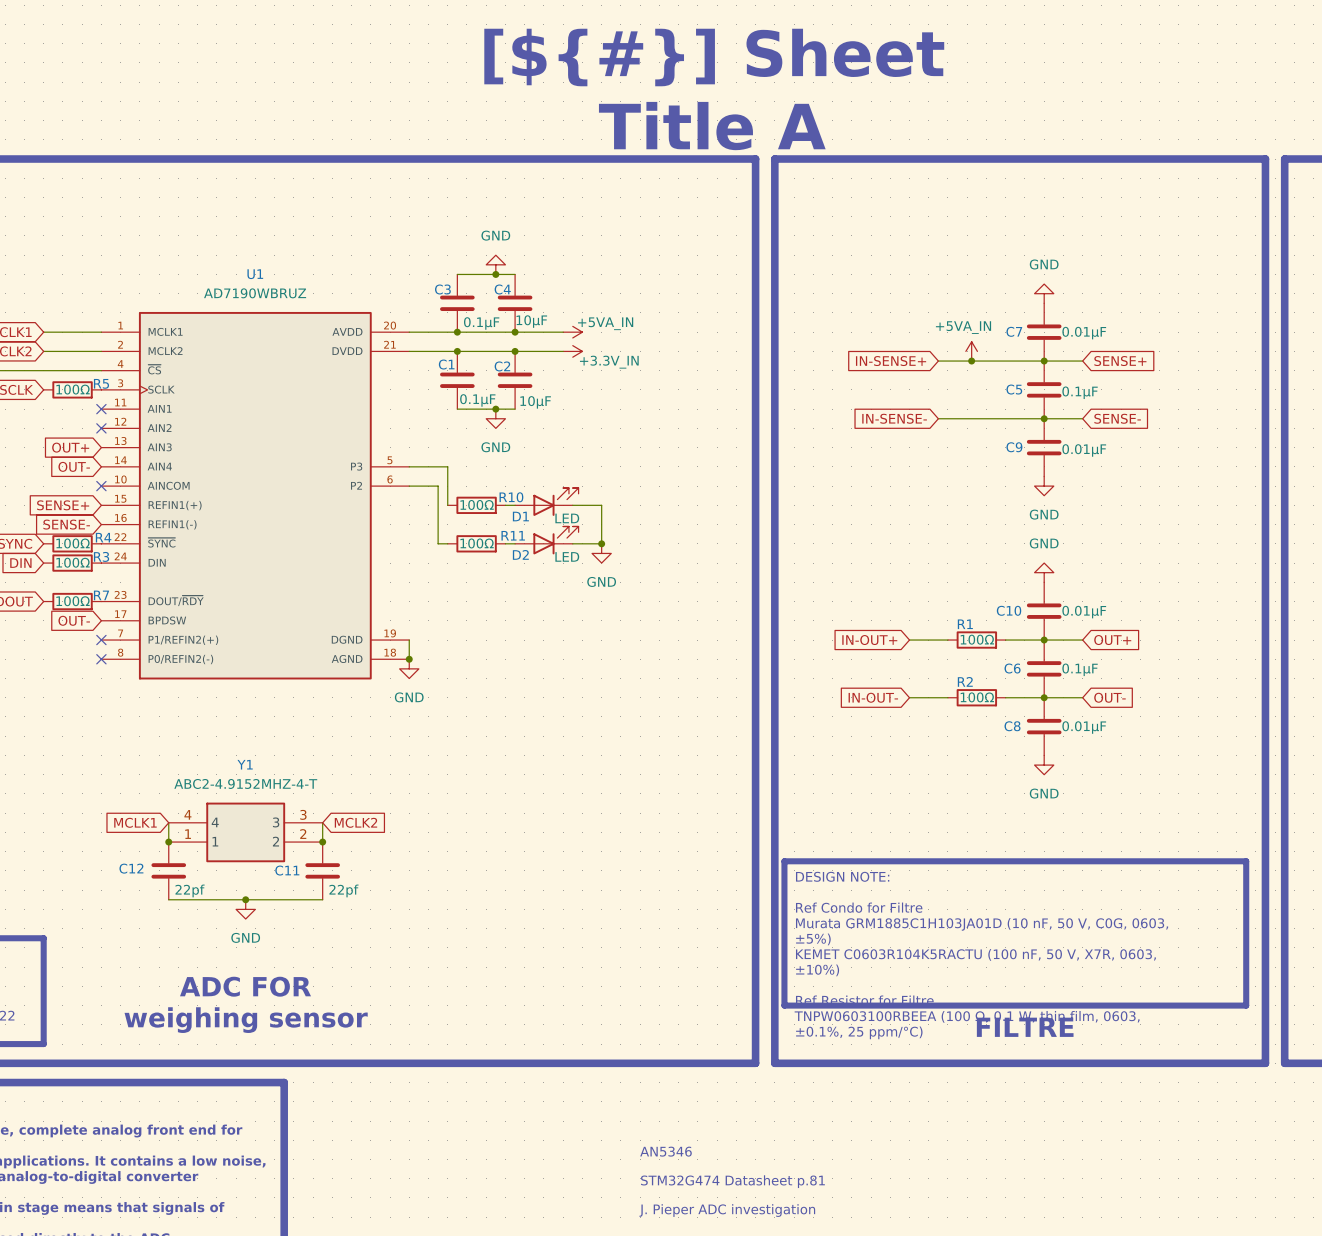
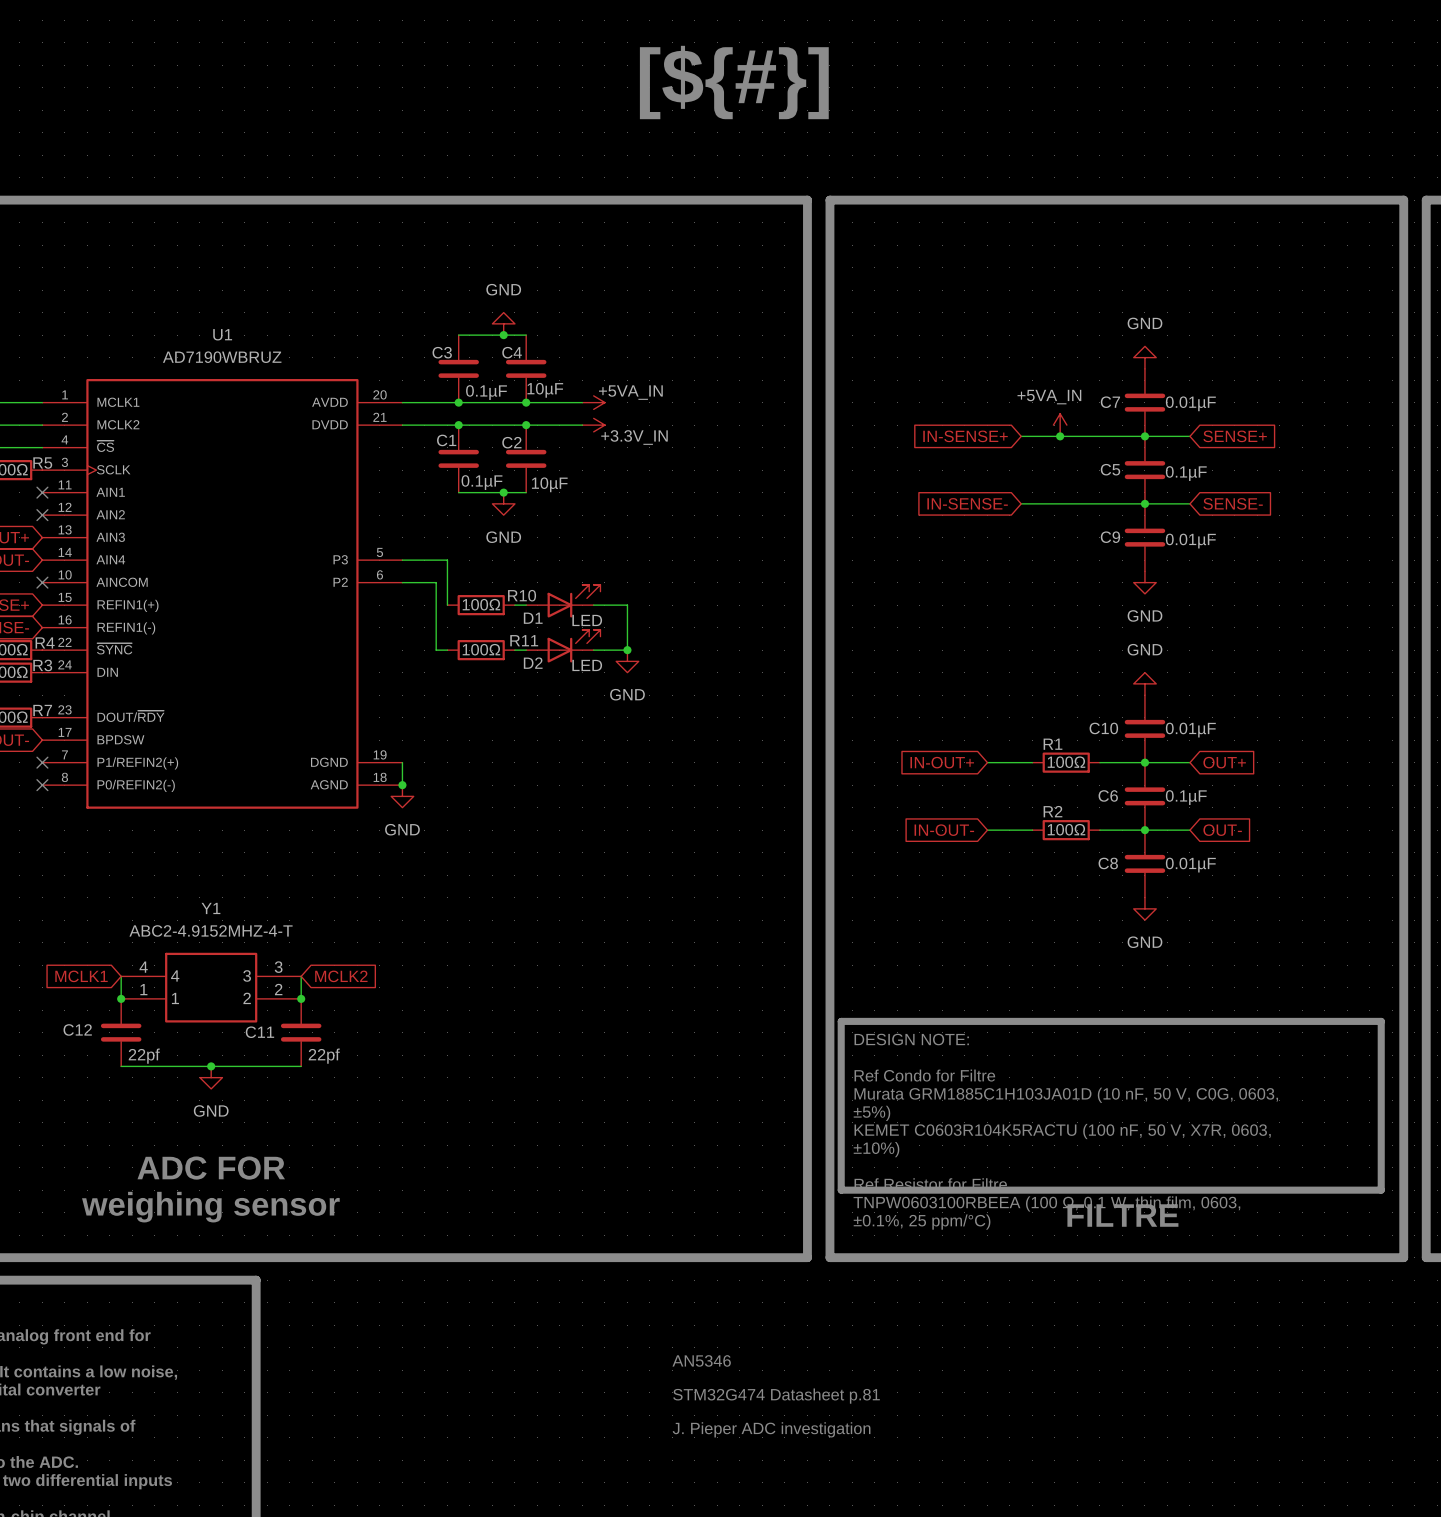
text: [${#}] Sheet (714, 57) -> [${#}] (734, 82)
text: Title A (712, 126) -> none

